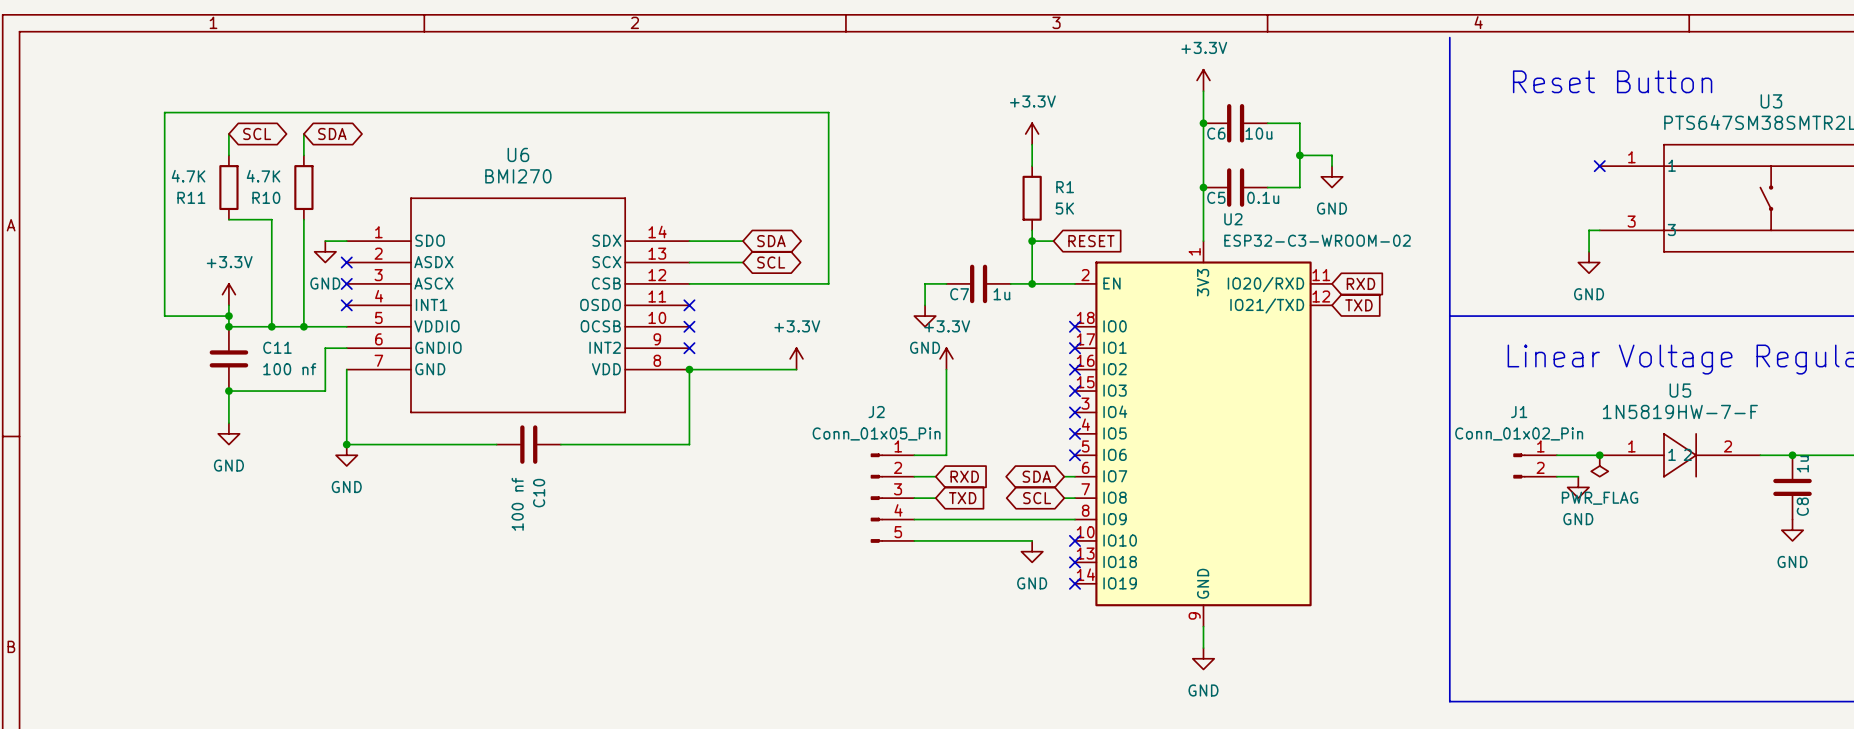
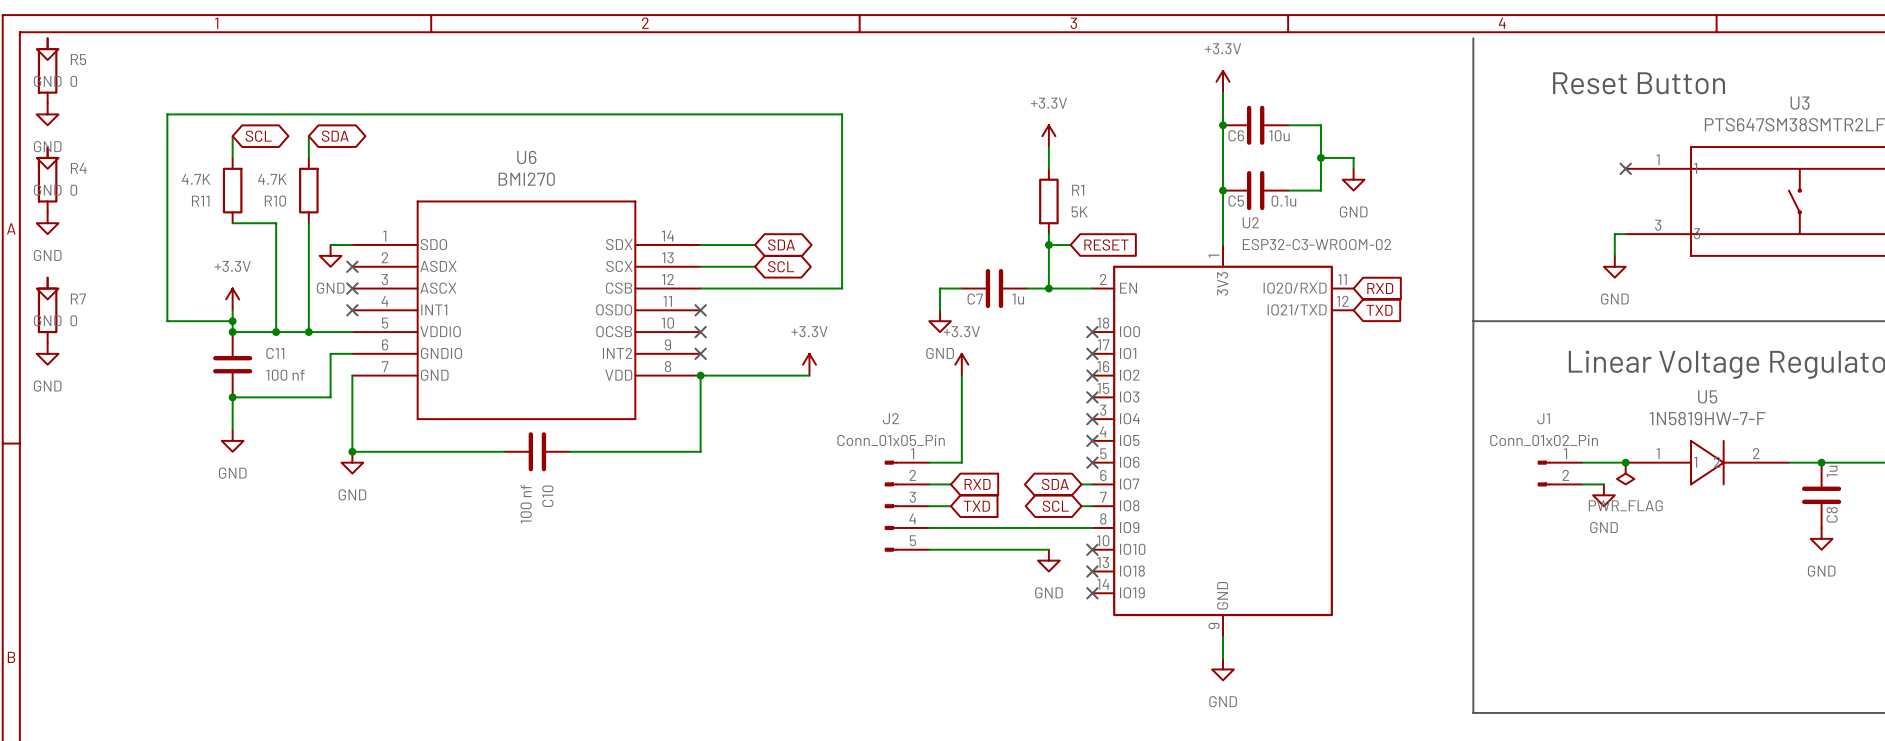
power symbol: none -> GND (47, 49)
R5: none -> 0 (47, 70)
power symbol: none -> GND (47, 114)
power symbol: none -> GND (47, 157)
R4: none -> 0 (47, 179)
power symbol: none -> GND (47, 223)
power symbol: none -> GND (47, 288)
R7: none -> 0 (47, 310)
power symbol: none -> GND (47, 353)

